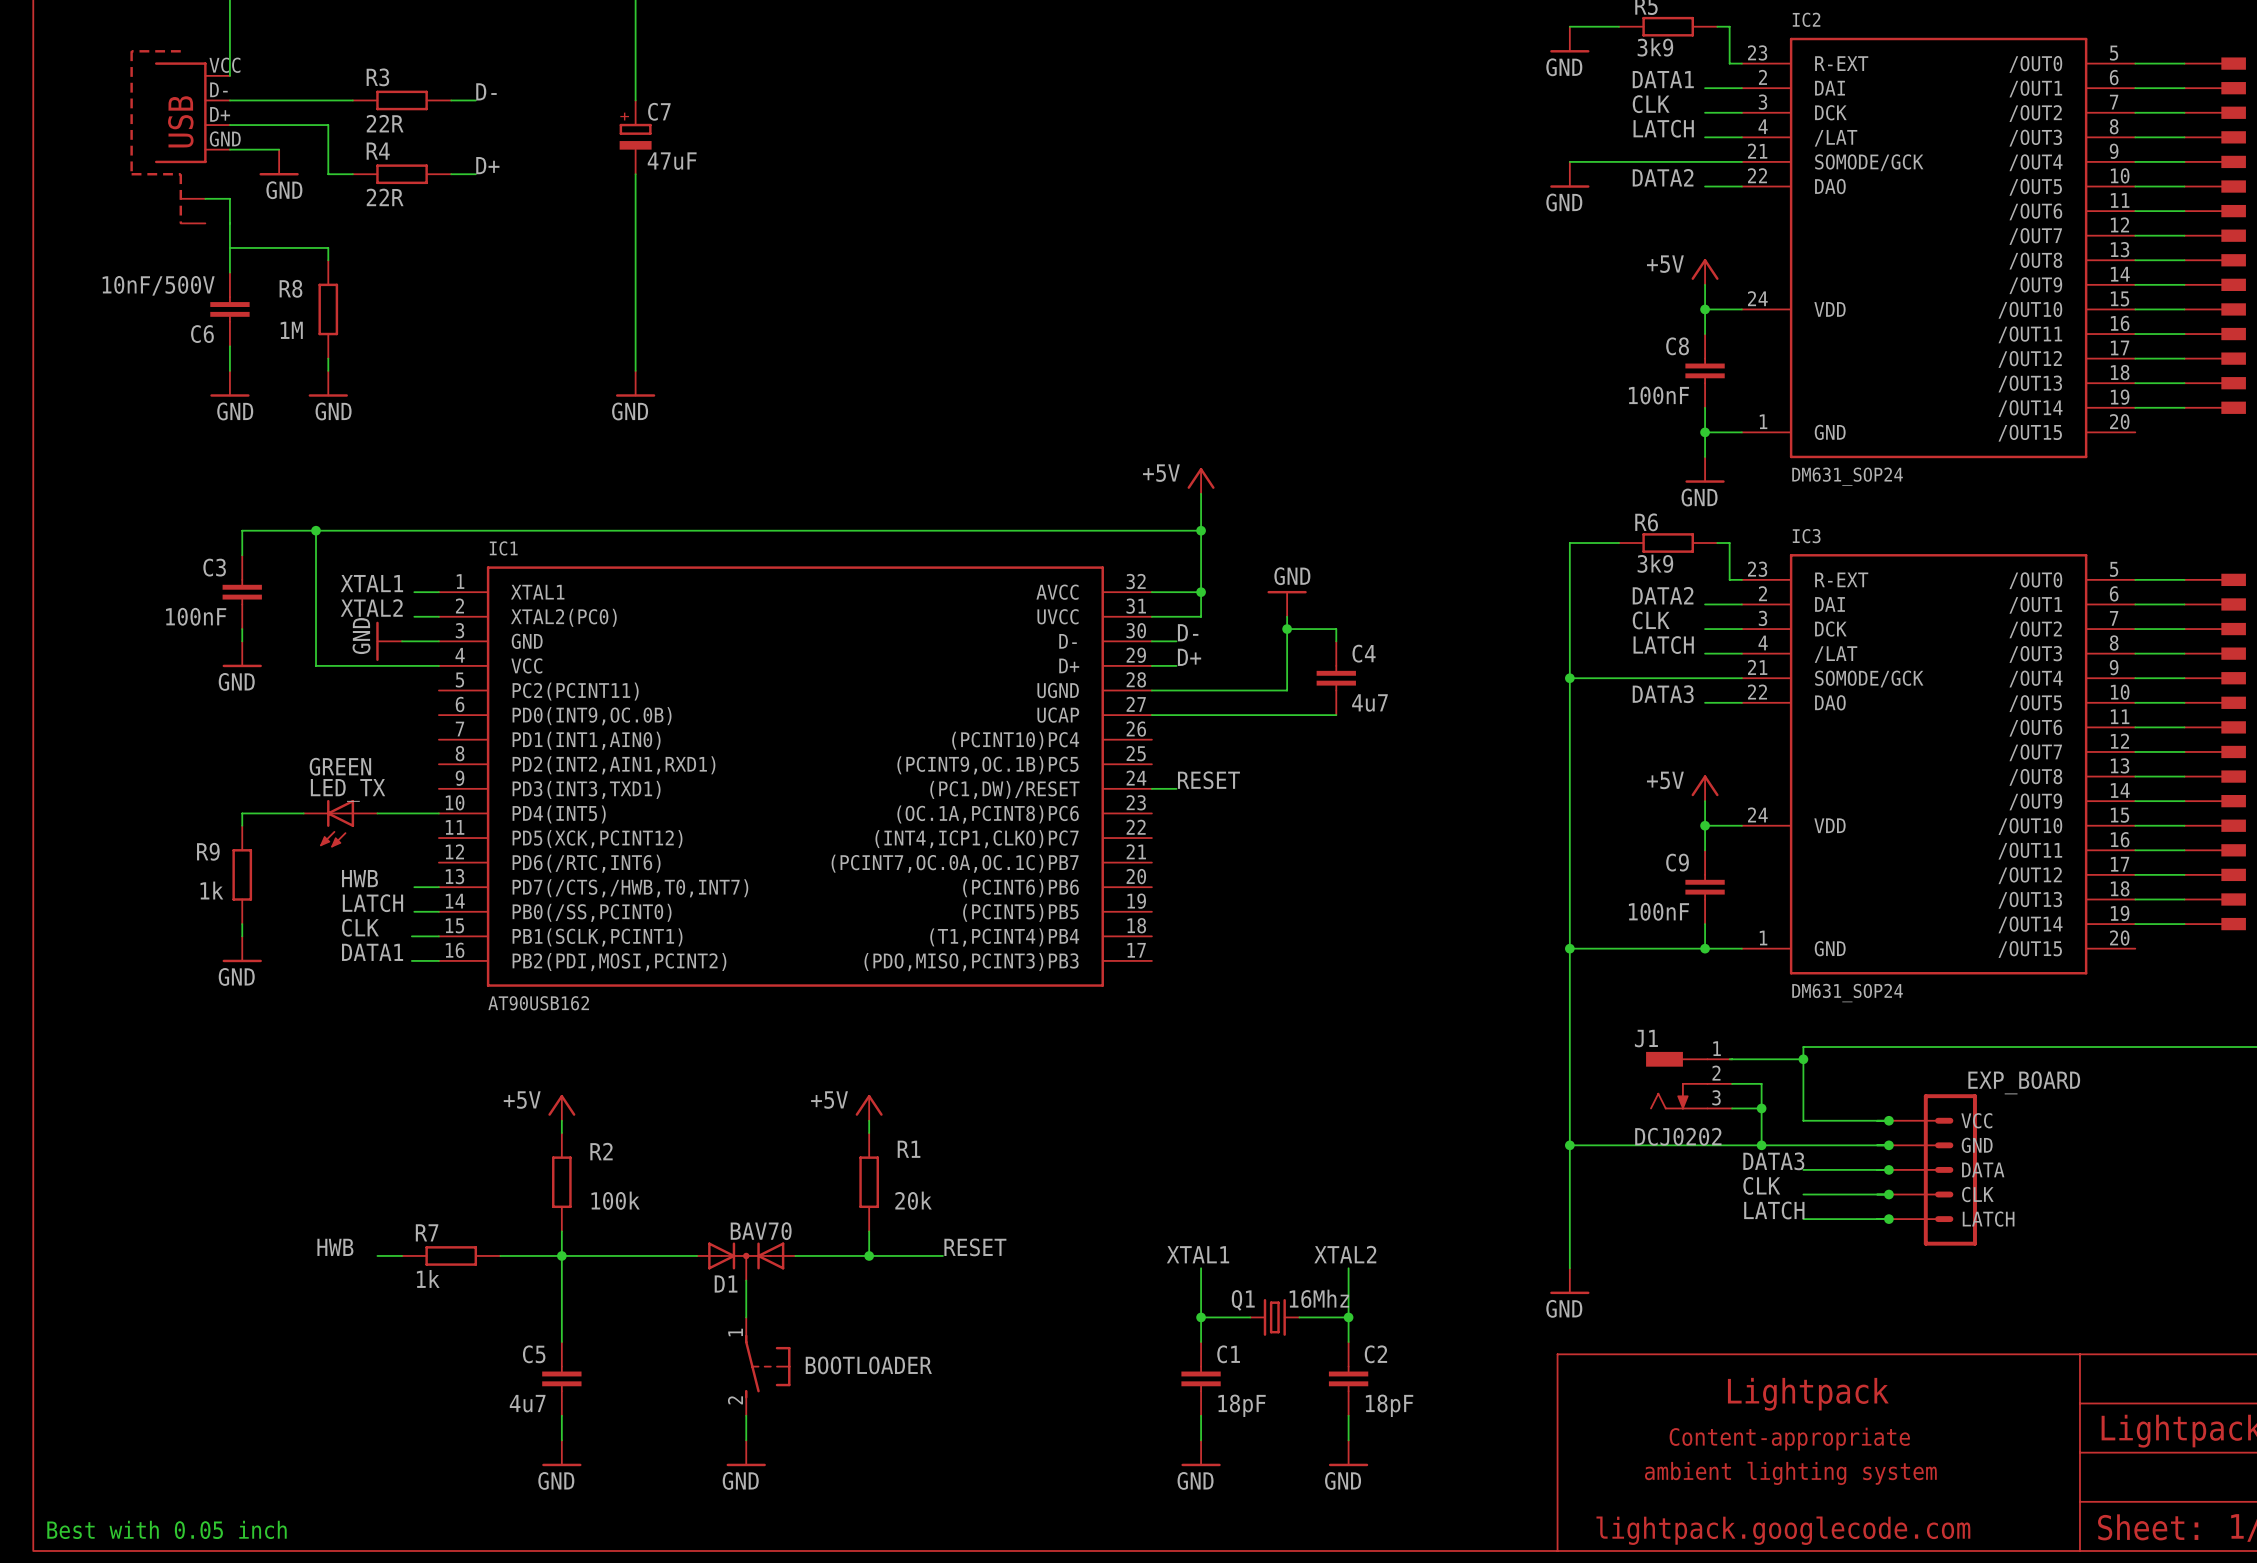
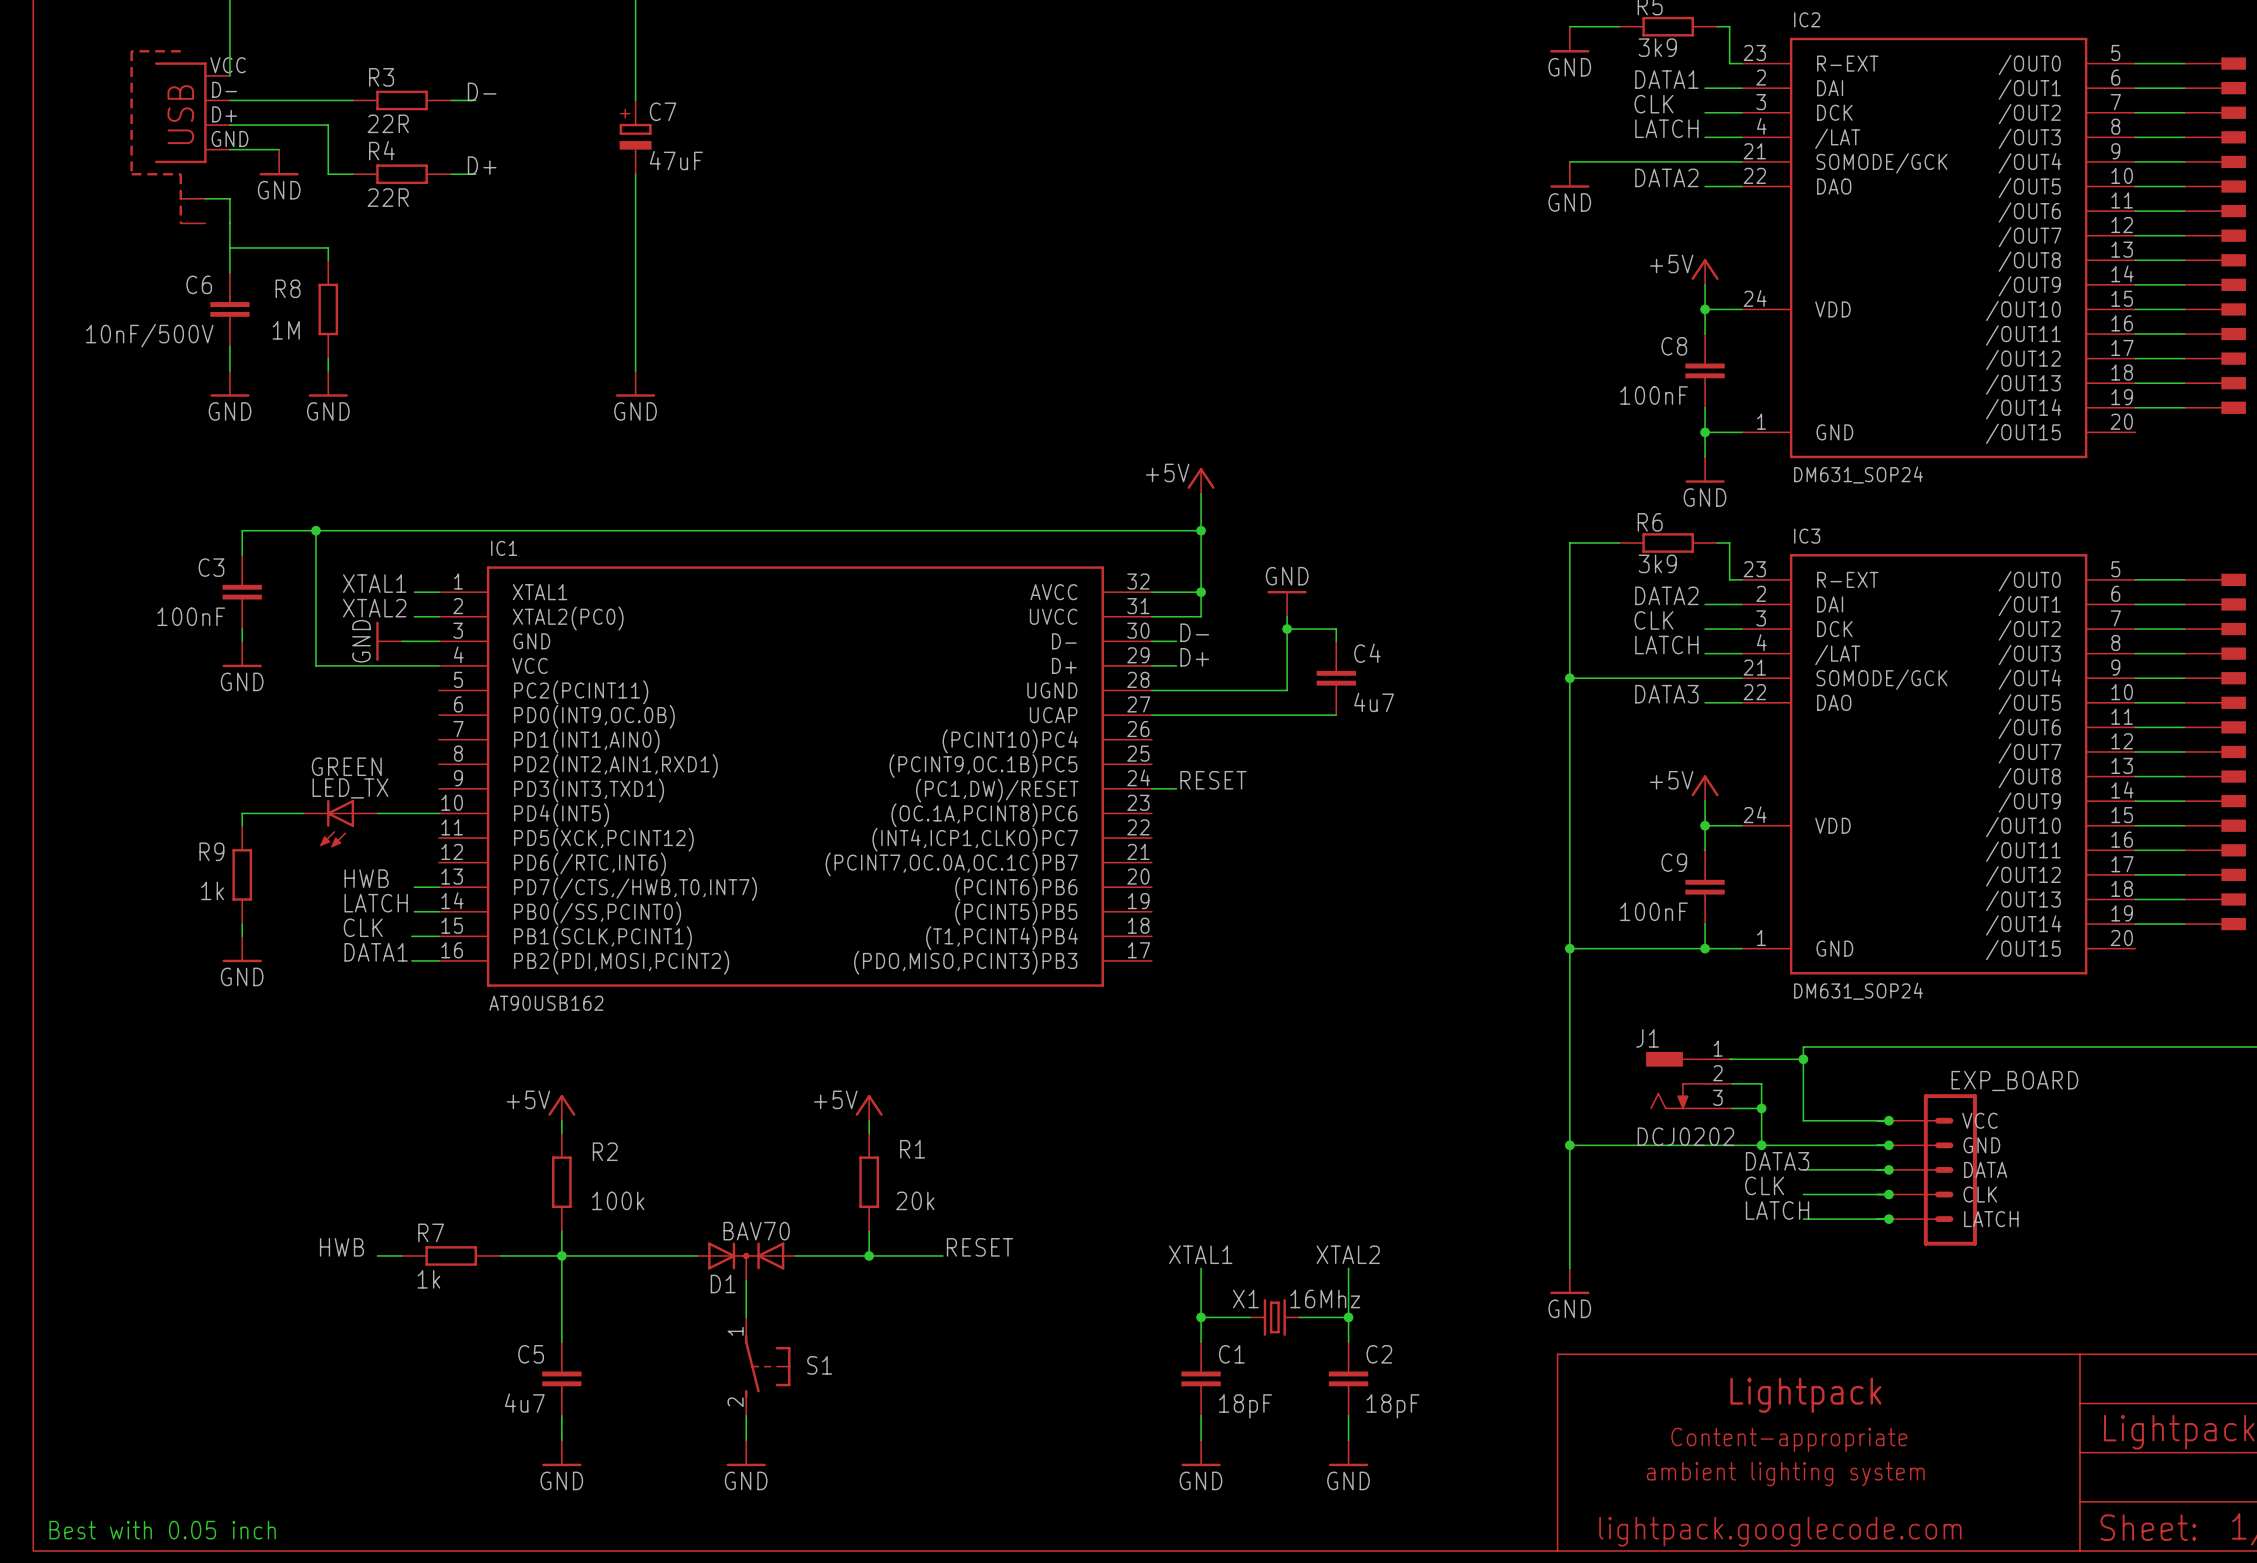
C6 value position: 10nF/500V (158, 285) -> 10nF/500V (149, 335)
C6 name position: C6 (202, 334) -> C6 (199, 284)
Q1 name: Q1 (1243, 1300) -> X1 (1245, 1299)
BOOTLOADER name: BOOTLOADER (868, 1365) -> S1 (819, 1365)

